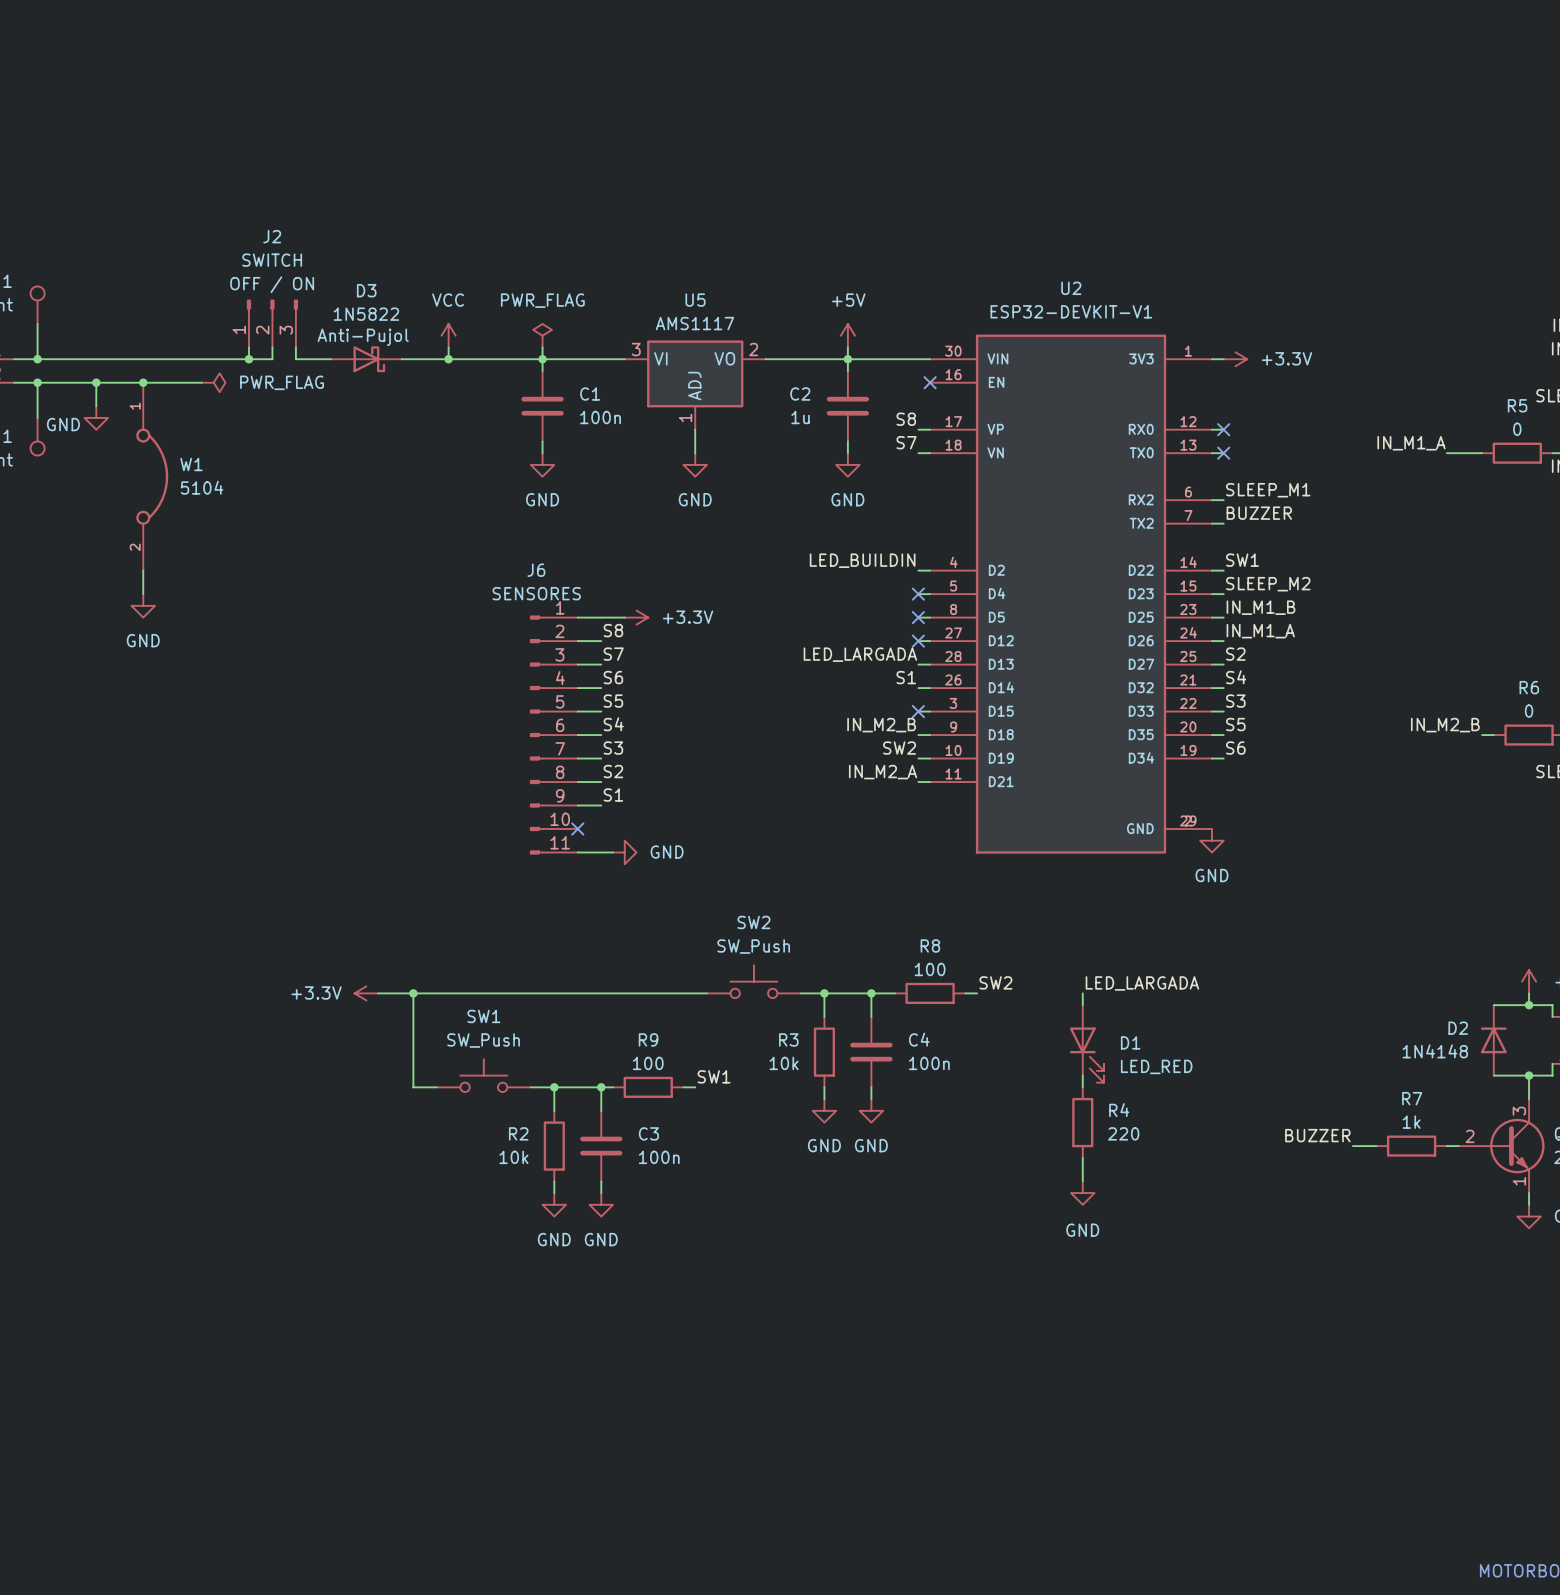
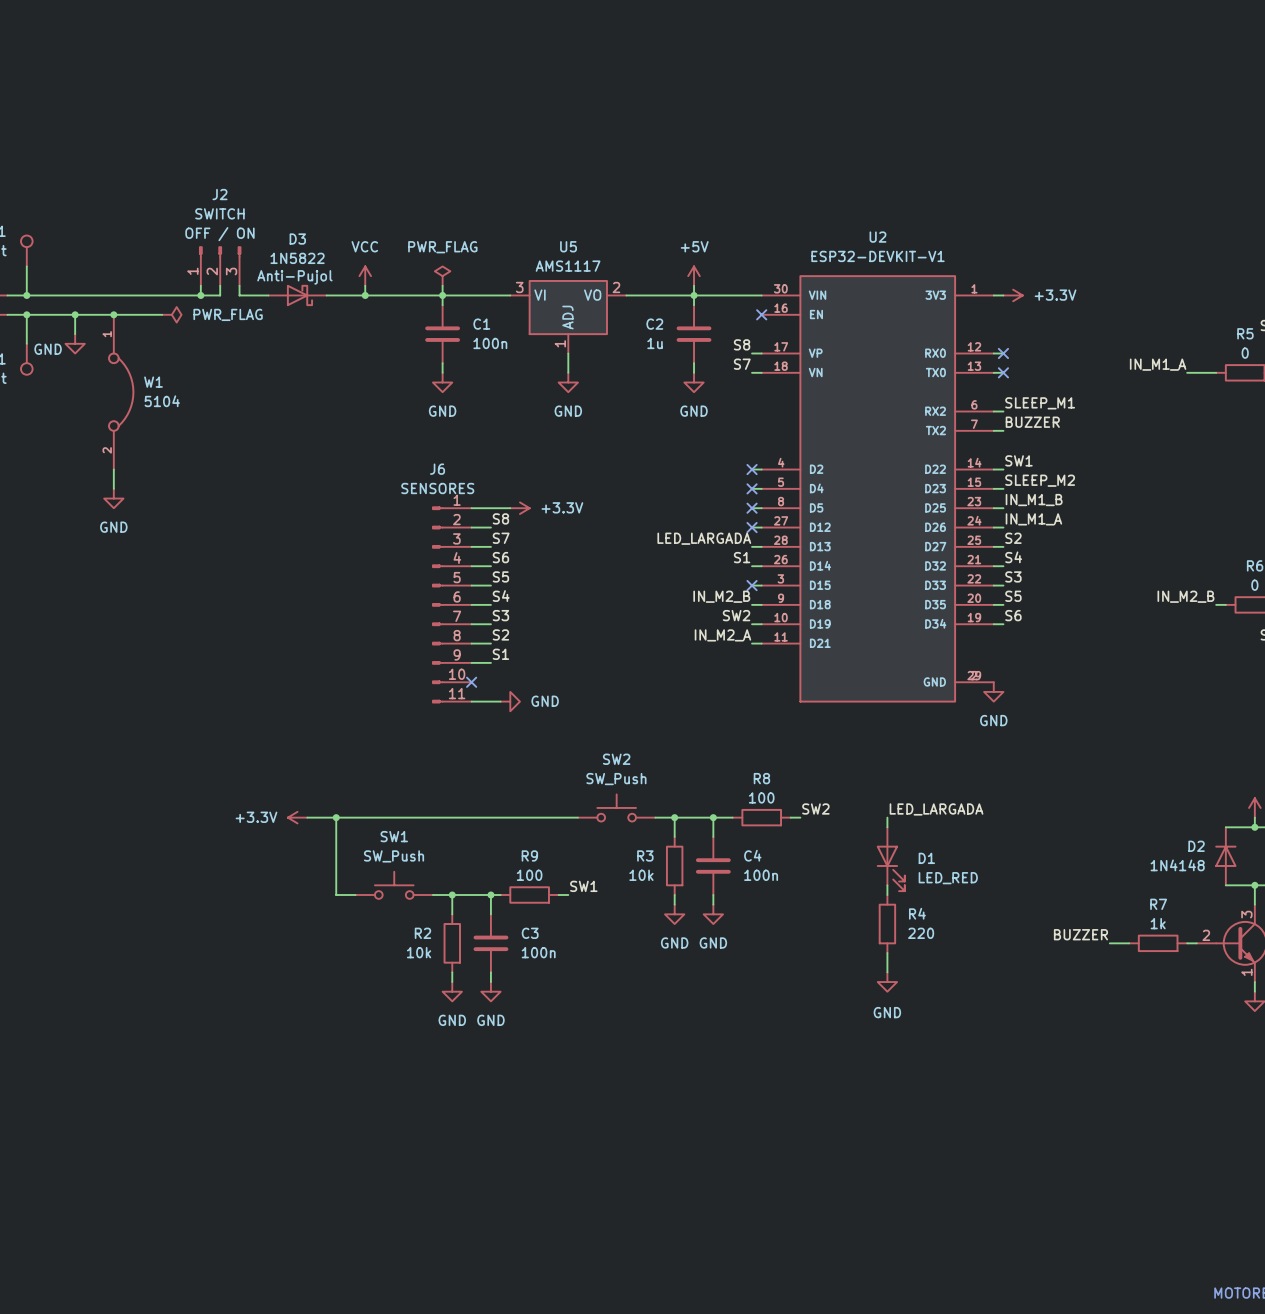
label: LED_BUILDIN (862, 560) -> none
no-connect mark: none -> (752, 469)

